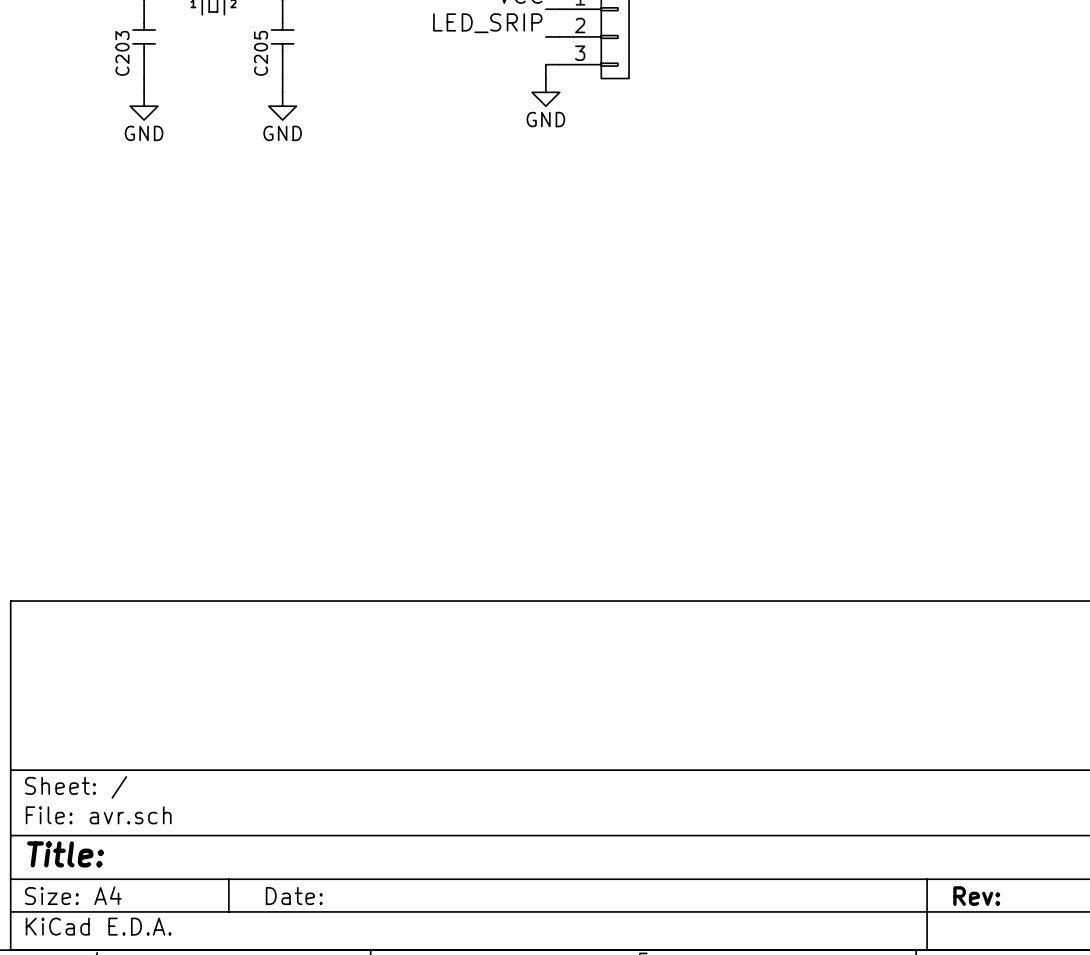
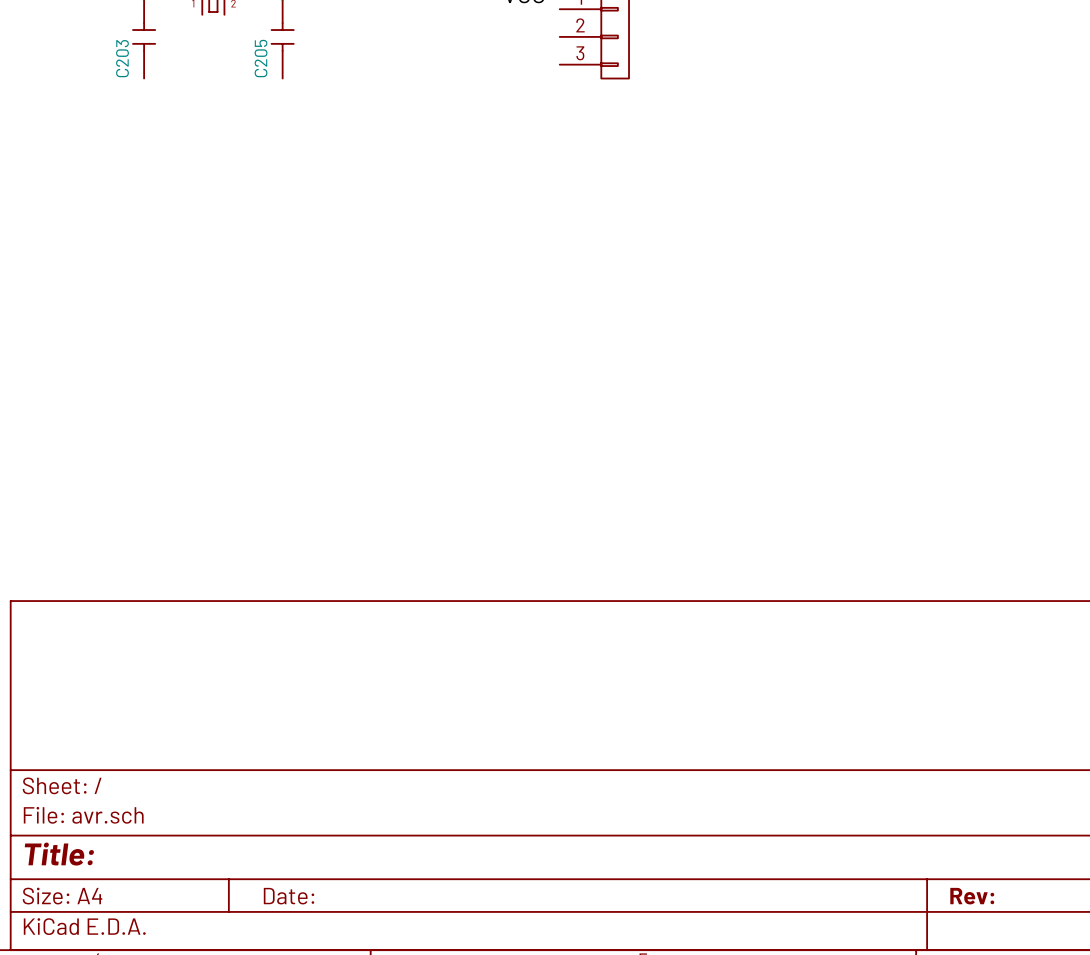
wire: (545, 9) (559, 9) -> none
label: LED_SRIP (487, 23) -> none
wire: (545, 36) (559, 36) -> none
wire: (559, 64) (545, 64) (545, 78) -> none
wire: (144, 78) (144, 92) -> none
wire: (282, 78) (282, 92) -> none
power symbol: GND (545, 92) -> none
power symbol: GND (144, 106) -> none
power symbol: GND (282, 106) -> none

